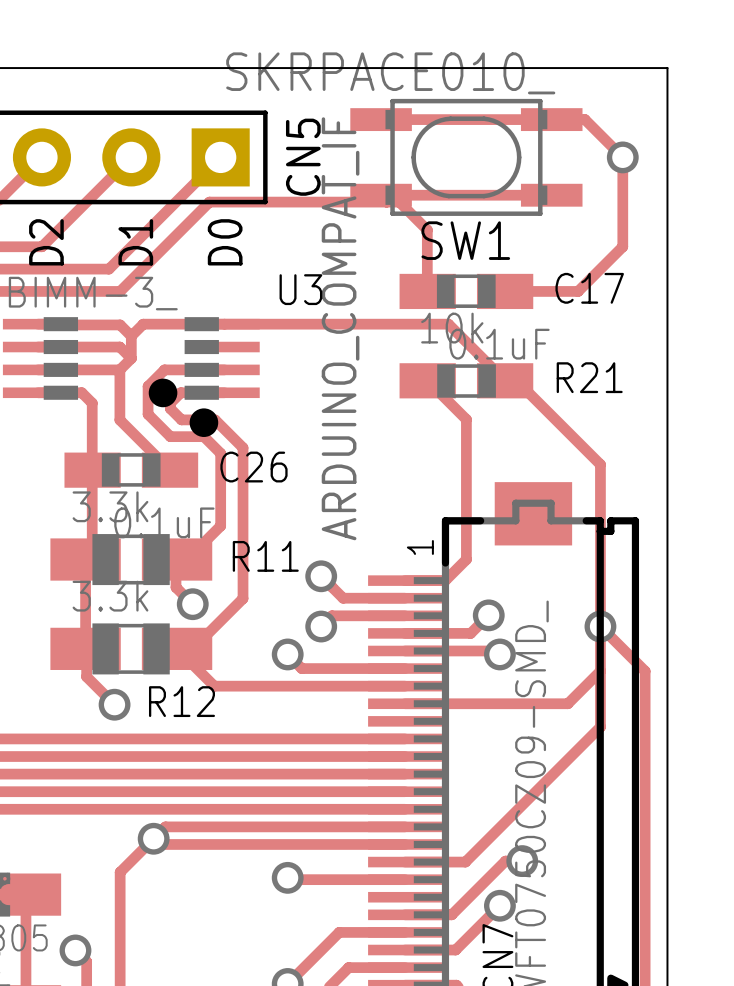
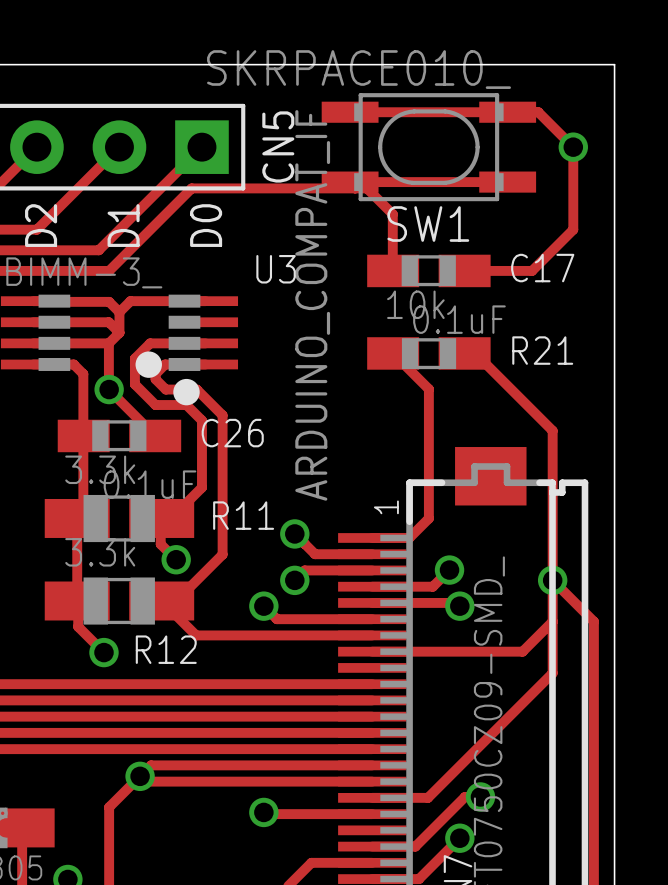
track: (224, 324) (448, 324) (505, 380) -> none
via: none -> (109, 389)

